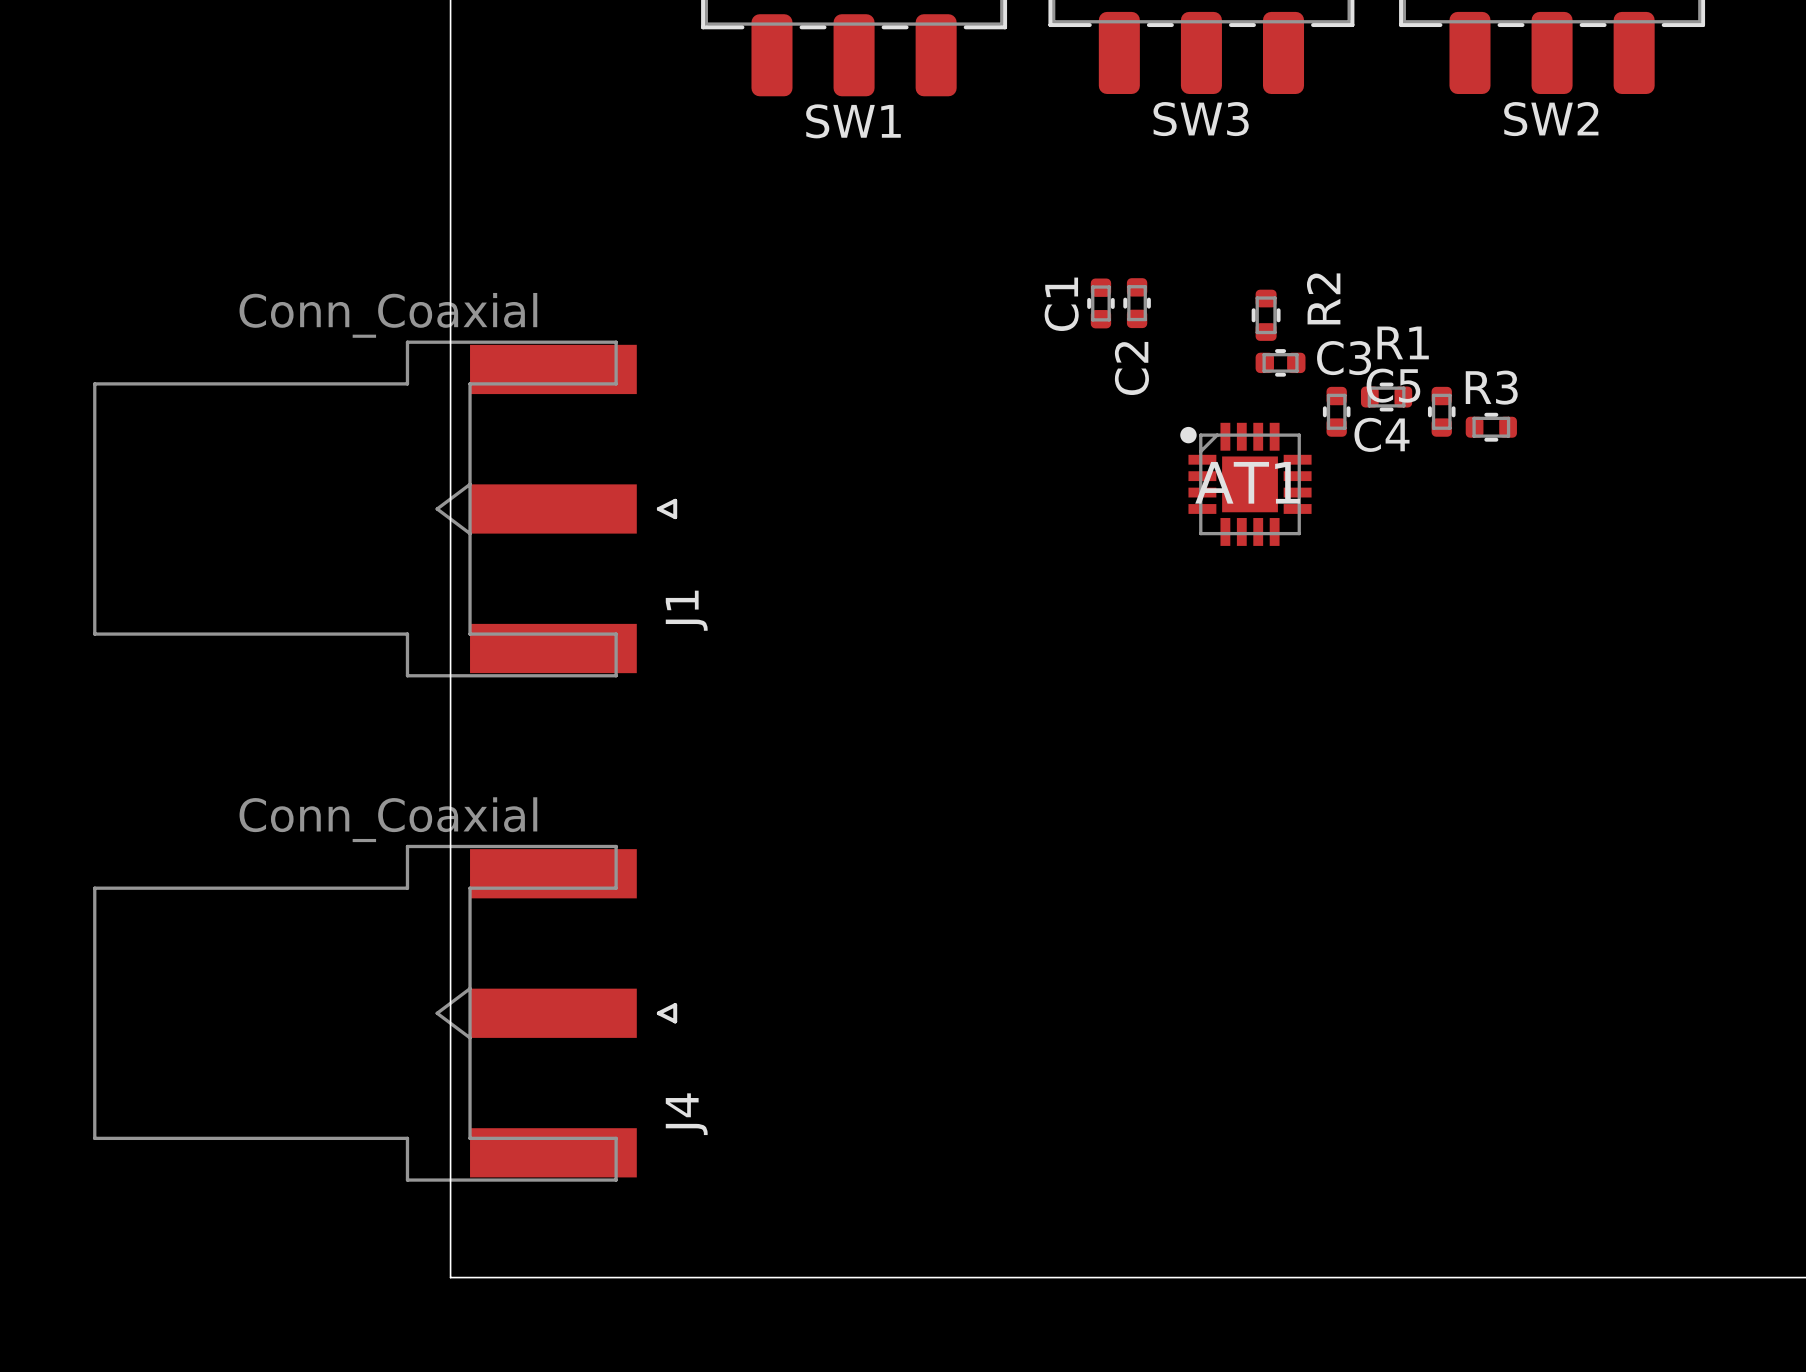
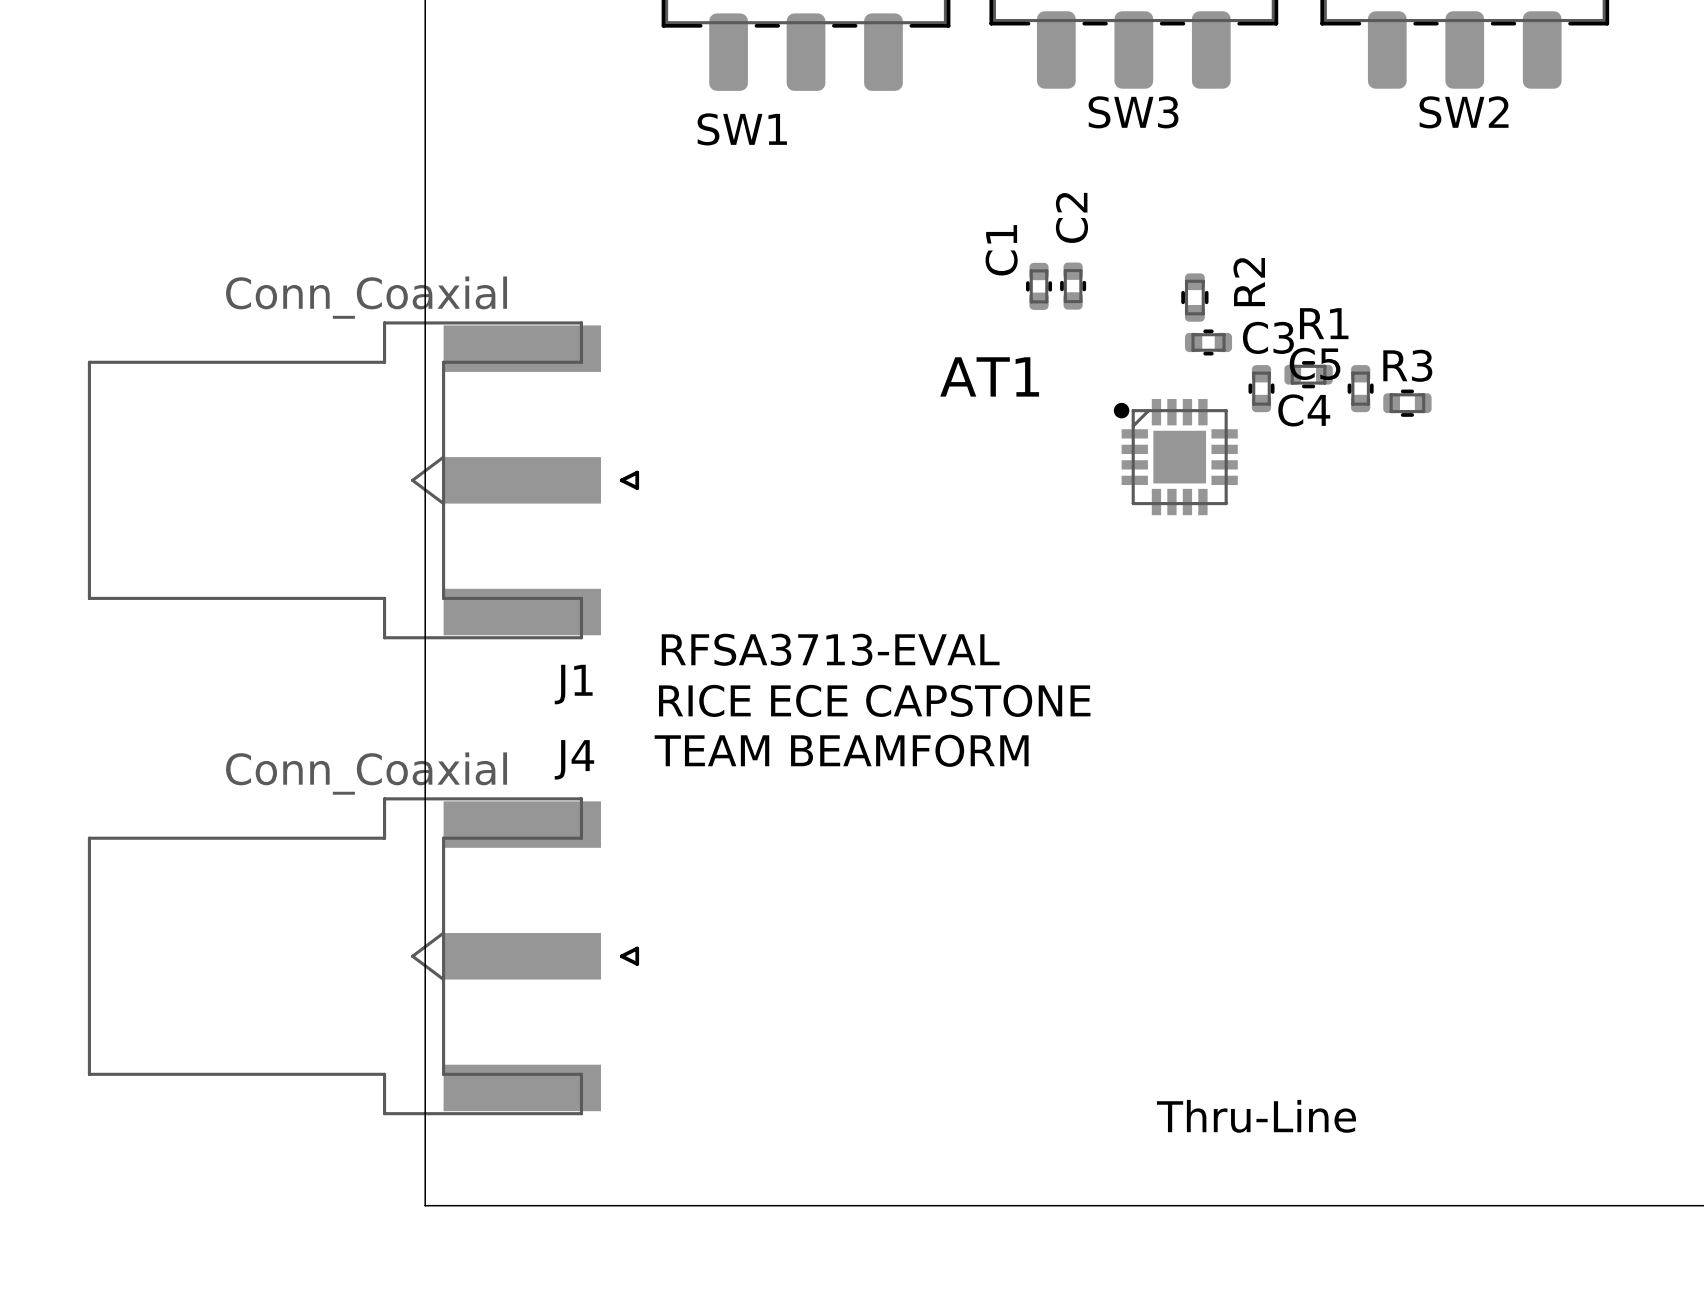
SW1 name position: SW1 (853, 121) -> SW1 (742, 129)
C1 name position: C1 (1061, 304) -> C1 (1001, 250)
C2 name position: C2 (1131, 368) -> C2 (1071, 217)
AT1 name position: AT1 (1247, 482) -> AT1 (989, 376)
J1 name rotation: 0° (686, 610) -> 90° clockwise (573, 684)
J1 name position: J1 (686, 610) -> J1 (573, 684)
text: none -> RFSA3713-EVAL (830, 649)
text: none -> RICE ECE CAPSTONE (874, 700)
text: none -> TEAM BEAMFORM (841, 750)
J4 name rotation: 0° (686, 1114) -> 90° clockwise (574, 759)
J4 name position: J4 (686, 1114) -> J4 (574, 759)
text: none -> Thru-Line (1256, 1116)

